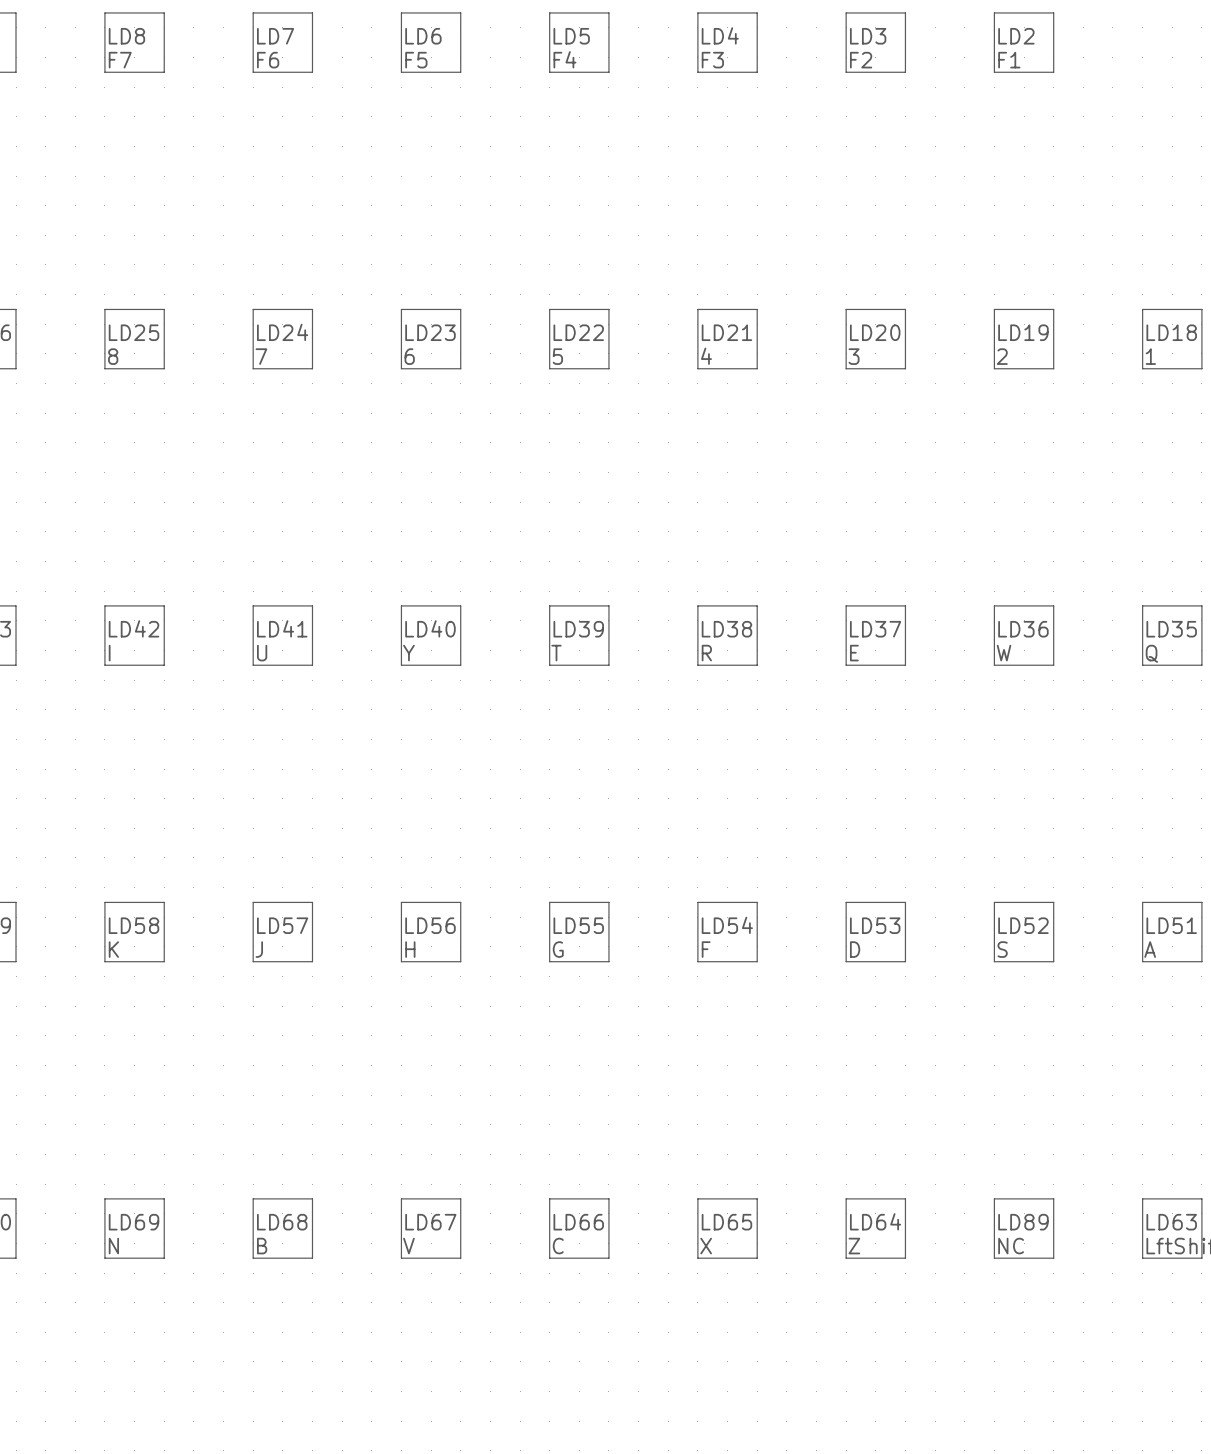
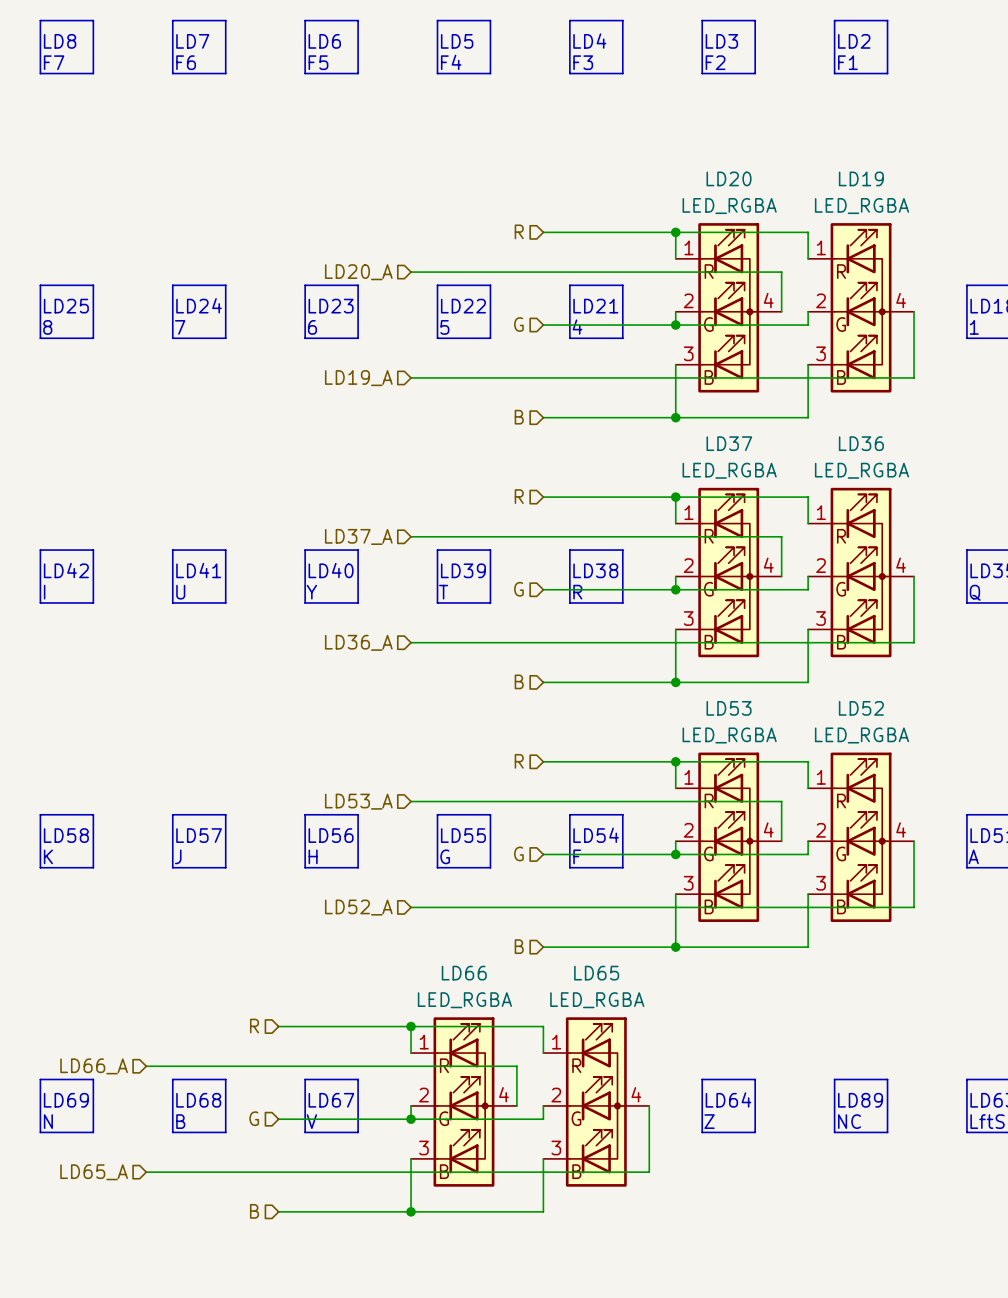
hierarchical label: none -> R (519, 231)
wire: none -> (543, 232) (808, 232) (808, 258)
wire: none -> (675, 232) (675, 258)
junction: none -> (675, 232)
hierarchical label: none -> LD20_A (358, 272)
wire: none -> (411, 272) (781, 272) (781, 311)
line: (846, 309) (846, 368) (905, 368) (905, 309) (846, 309) -> none
line: (994, 309) (994, 368) (1053, 368) (1053, 309) (994, 309) -> none
text: LD20 (875, 332) -> none
text: LD19 (1023, 332) -> none
LD20: none -> LED_RGBA (728, 307)
LD19: none -> LED_RGBA (861, 307)
wire: none -> (675, 311) (675, 325)
wire: none -> (808, 311) (808, 325) (543, 325)
wire: none -> (914, 311) (914, 377) (411, 377)
hierarchical label: none -> G (518, 324)
junction: none -> (675, 325)
text: 3 (854, 356) -> none
text: 2 (1002, 356) -> none
wire: none -> (675, 364) (675, 417)
wire: none -> (808, 364) (808, 417) (543, 417)
hierarchical label: none -> LD19_A (358, 378)
hierarchical label: none -> B (519, 417)
junction: none -> (675, 417)
hierarchical label: none -> R (519, 496)
wire: none -> (543, 497) (808, 497) (808, 523)
wire: none -> (675, 497) (675, 523)
junction: none -> (675, 497)
hierarchical label: none -> LD37_A (358, 536)
wire: none -> (411, 536) (781, 536) (781, 576)
line: (846, 605) (846, 665) (905, 665) (905, 605) (846, 605) -> none
line: (994, 605) (994, 665) (1053, 665) (1053, 605) (994, 605) -> none
text: LD37 (875, 629) -> none
text: LD36 (1023, 629) -> none
LD37: none -> LED_RGBA (728, 572)
LD36: none -> LED_RGBA (861, 572)
wire: none -> (675, 576) (675, 589)
wire: none -> (808, 576) (808, 589) (543, 589)
wire: none -> (914, 576) (914, 642) (411, 642)
hierarchical label: none -> G (518, 589)
junction: none -> (675, 589)
text: E (854, 653) -> none
text: W (1004, 653) -> none
wire: none -> (675, 629) (675, 682)
wire: none -> (808, 629) (808, 682) (543, 682)
hierarchical label: none -> LD36_A (358, 642)
hierarchical label: none -> B (519, 681)
junction: none -> (675, 682)
hierarchical label: none -> R (519, 761)
wire: none -> (543, 761) (808, 761) (808, 788)
wire: none -> (675, 761) (675, 788)
junction: none -> (675, 761)
hierarchical label: none -> LD53_A (358, 801)
wire: none -> (411, 801) (781, 801) (781, 841)
line: (846, 902) (846, 961) (905, 961) (905, 902) (846, 902) -> none
line: (994, 902) (994, 961) (1053, 961) (1053, 902) (994, 902) -> none
text: LD53 (875, 925) -> none
text: LD52 (1023, 925) -> none
LD53: none -> LED_RGBA (728, 837)
LD52: none -> LED_RGBA (861, 837)
wire: none -> (675, 841) (675, 854)
wire: none -> (808, 841) (808, 854) (543, 854)
wire: none -> (914, 841) (914, 907) (411, 907)
hierarchical label: none -> G (518, 853)
junction: none -> (675, 854)
text: D (855, 949) -> none
text: S (1002, 949) -> none
wire: none -> (675, 894) (675, 947)
wire: none -> (808, 894) (808, 947) (543, 947)
hierarchical label: none -> LD52_A (358, 907)
hierarchical label: none -> B (519, 946)
junction: none -> (675, 947)
hierarchical label: none -> R (254, 1026)
wire: none -> (278, 1026) (543, 1026) (543, 1053)
wire: none -> (411, 1026) (411, 1053)
junction: none -> (411, 1026)
hierarchical label: none -> LD66_A (94, 1066)
wire: none -> (146, 1066) (516, 1066) (516, 1105)
line: (549, 1198) (549, 1258) (608, 1258) (608, 1198) (549, 1198) -> none
line: (697, 1198) (757, 1198) (757, 1258) (697, 1258) (697, 1198) -> none
text: LD66 (578, 1222) -> none
text: LD65 (726, 1222) -> none
LD66: none -> LED_RGBA (463, 1101)
LD65: none -> LED_RGBA (596, 1101)
wire: none -> (411, 1105) (411, 1119)
wire: none -> (543, 1105) (543, 1119) (278, 1119)
wire: none -> (649, 1105) (649, 1172) (146, 1172)
hierarchical label: none -> G (254, 1118)
junction: none -> (411, 1119)
text: C (558, 1246) -> none
text: X (706, 1246) -> none
wire: none -> (411, 1158) (411, 1211)
wire: none -> (543, 1158) (543, 1211) (278, 1211)
hierarchical label: none -> LD65_A (94, 1172)
hierarchical label: none -> B (254, 1211)
junction: none -> (411, 1211)

